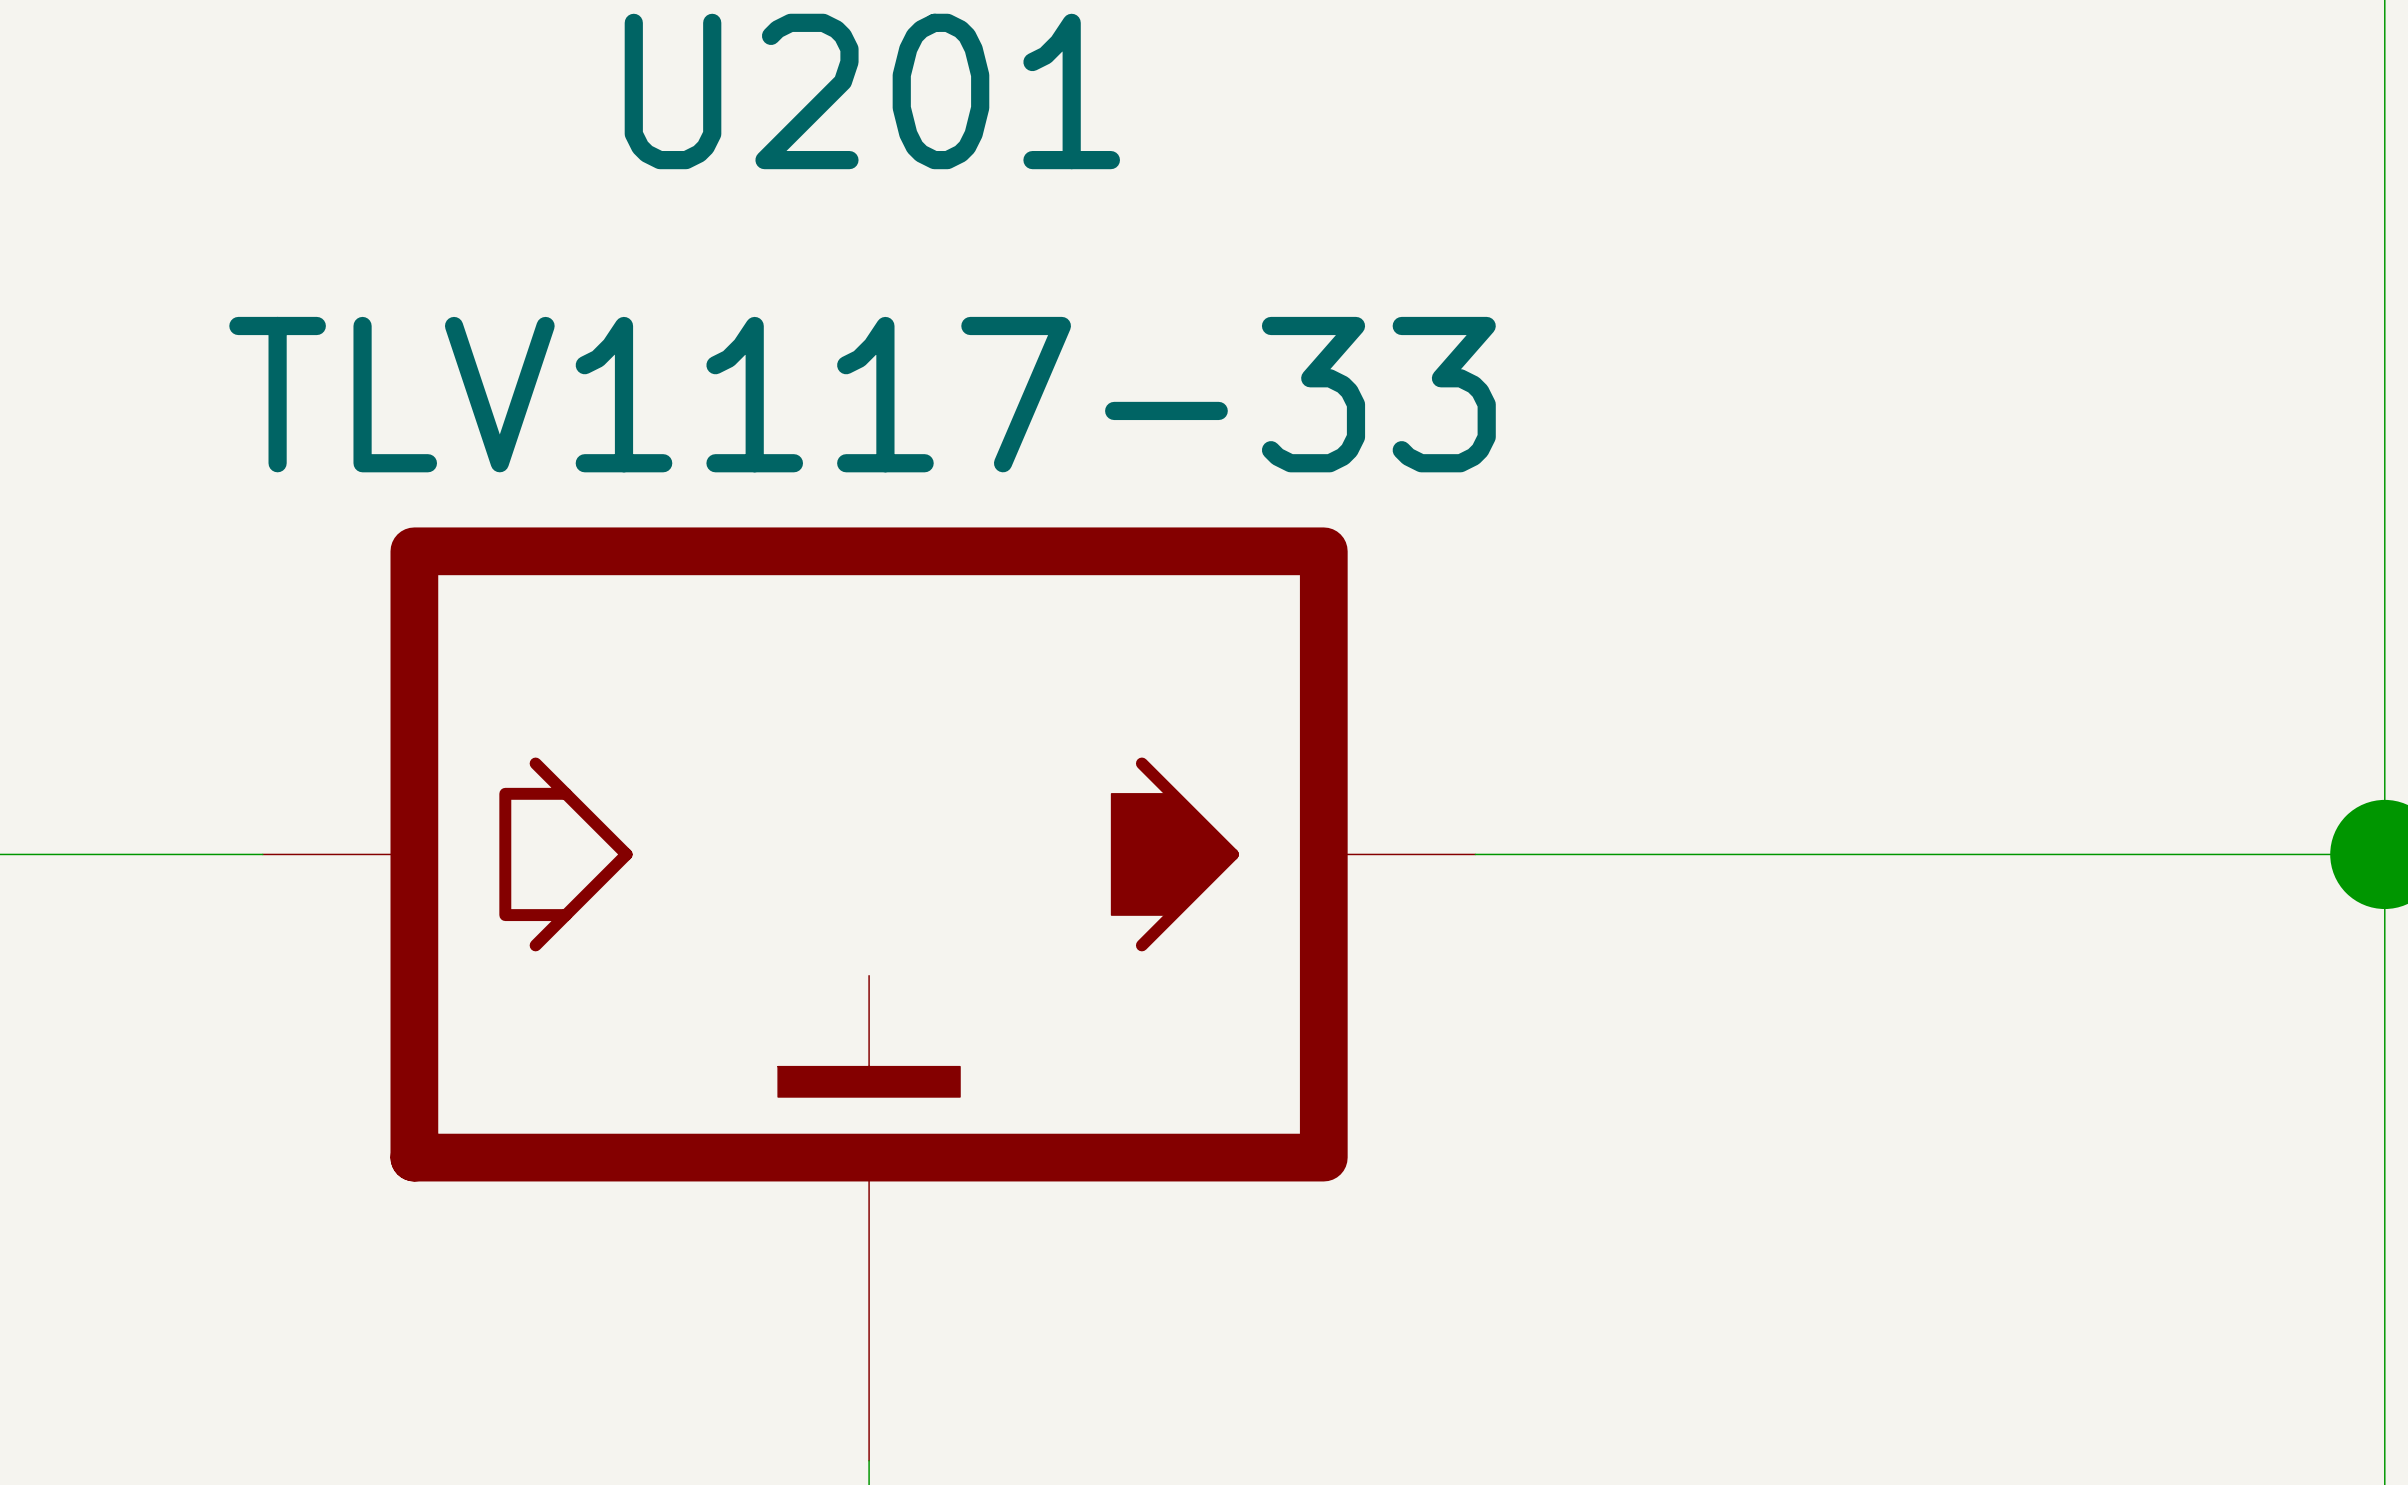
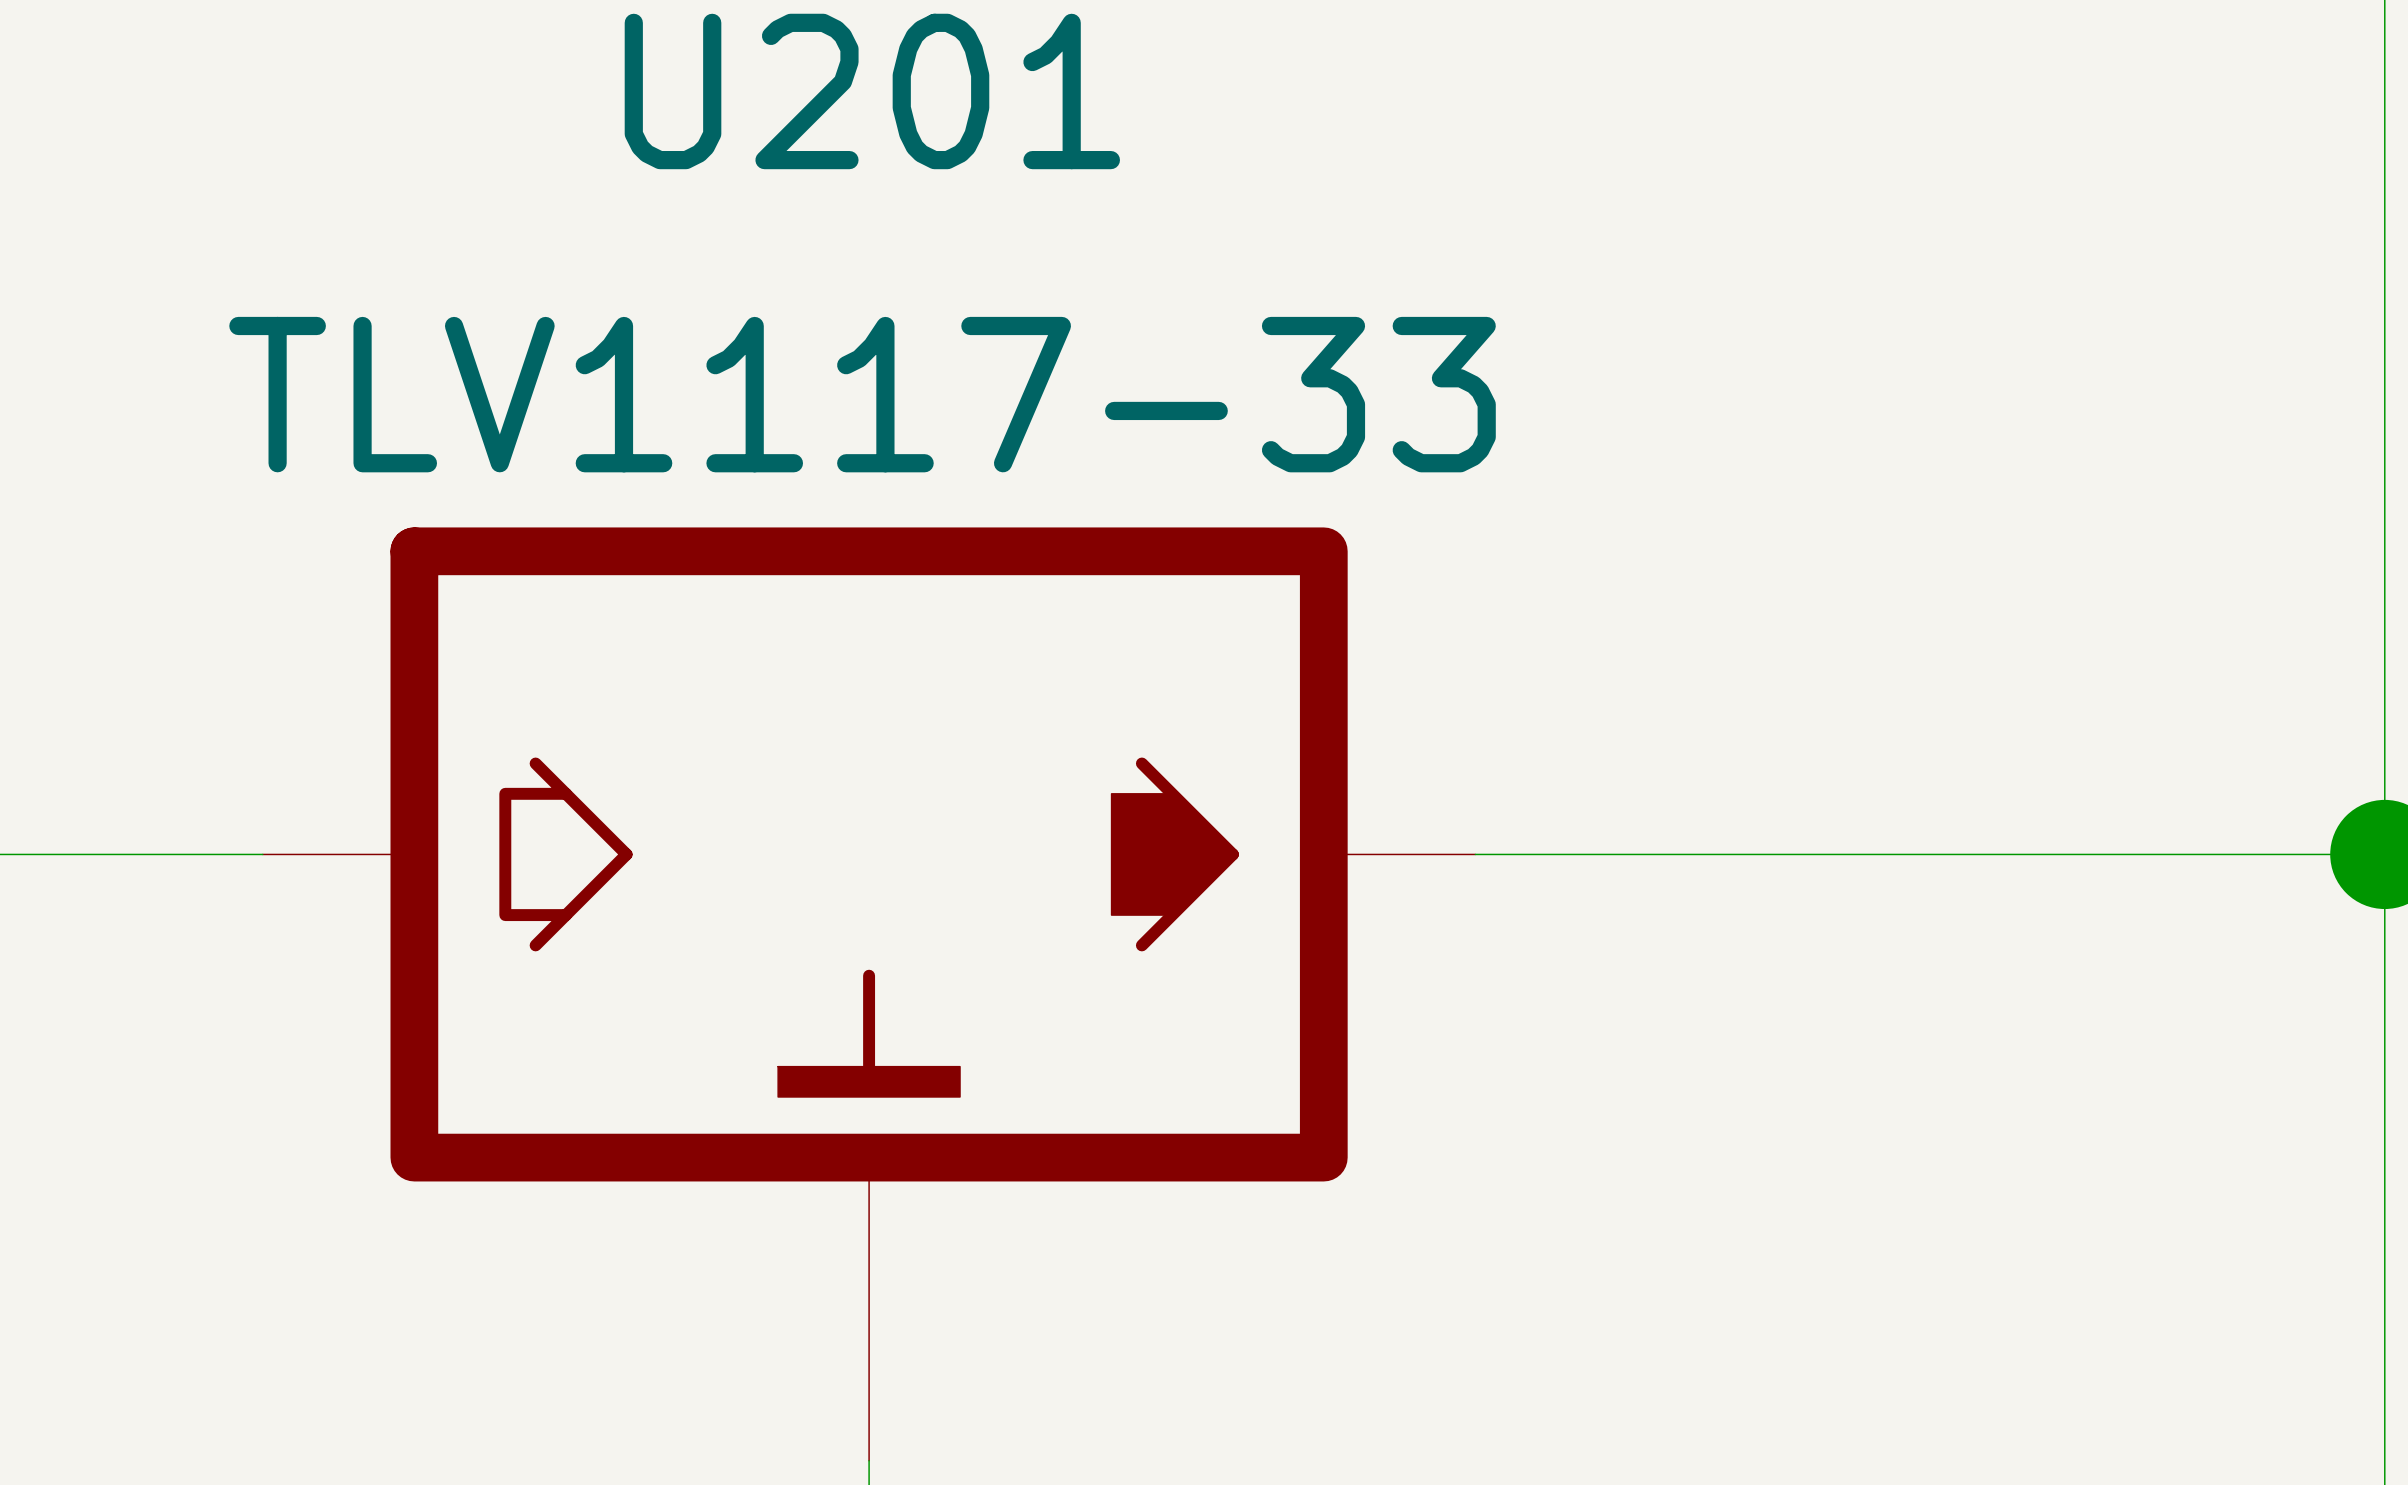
U201 symbol: [262, 527, 1476, 1461] -> [262, 527, 1476, 1461]

